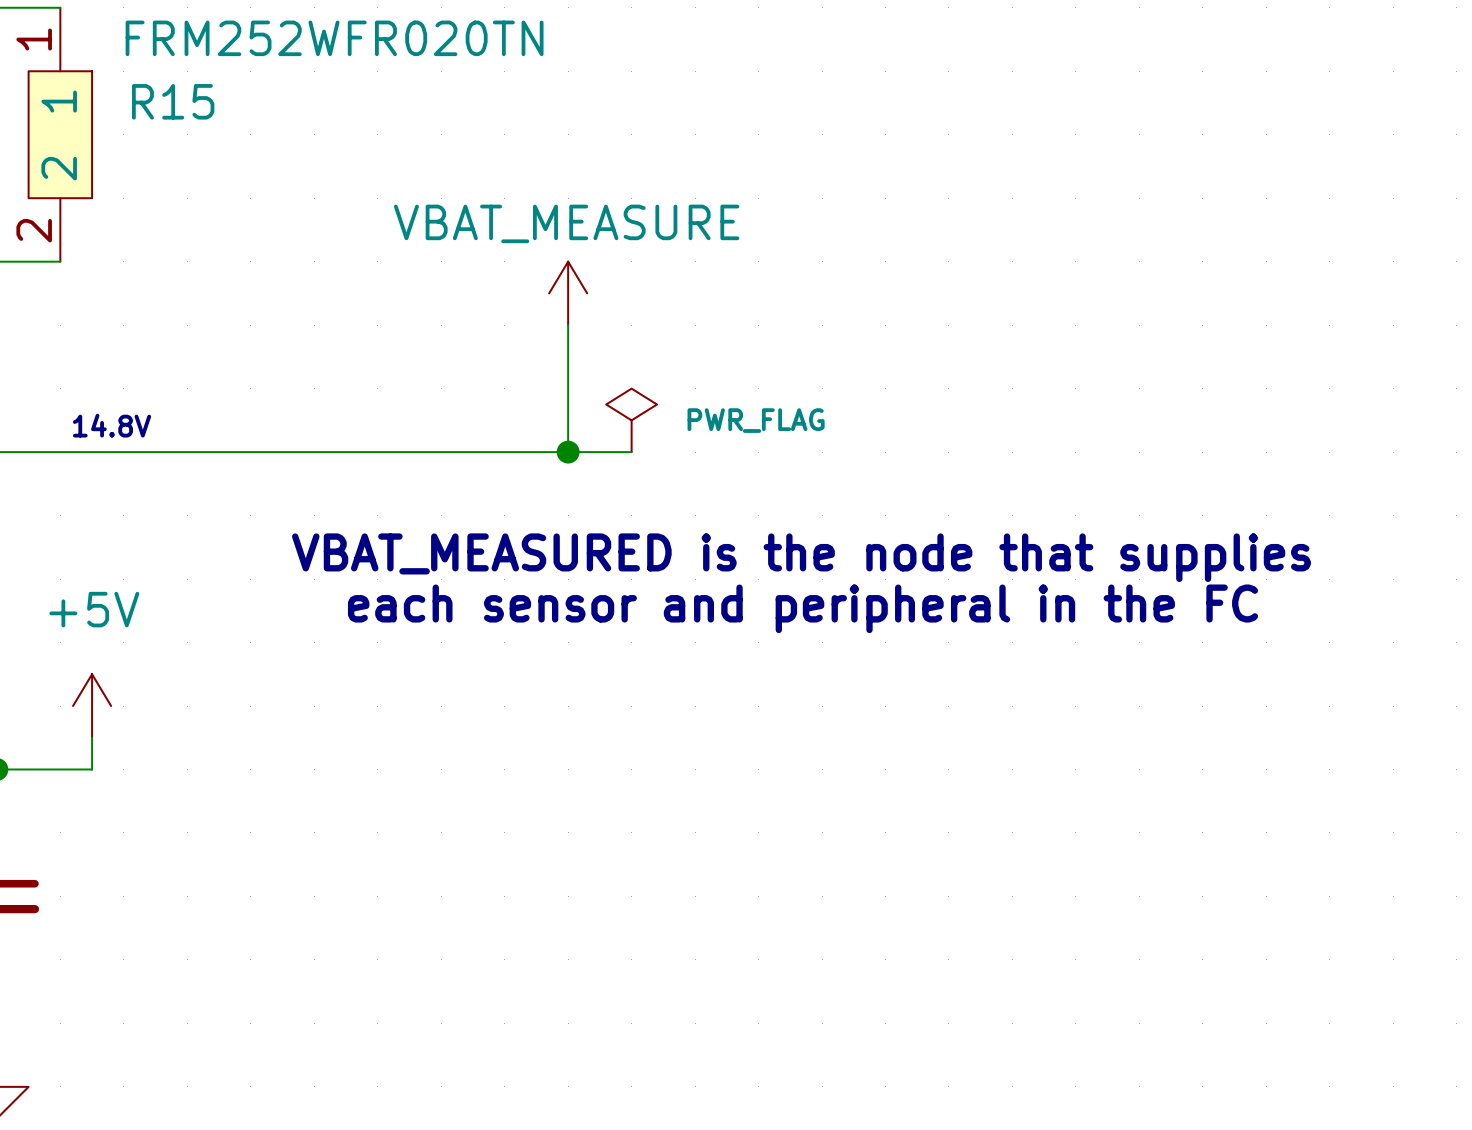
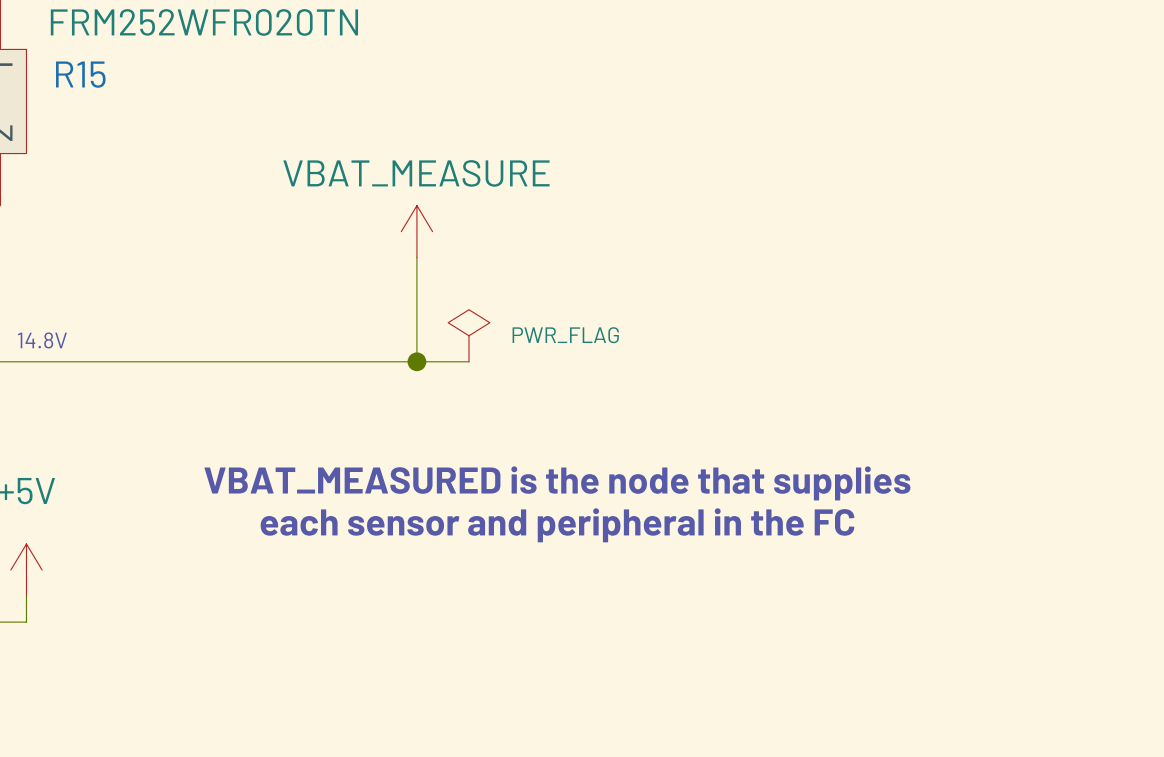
text position: VBAT_MEASURED is the node that supplies (801, 557) -> VBAT_MEASURED is the node that supplies (557, 483)
text position: each sensor and peripheral in the FC (803, 608) -> each sensor and peripheral in the FC (557, 525)

